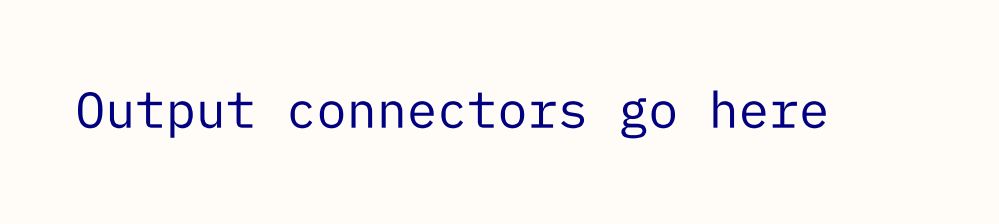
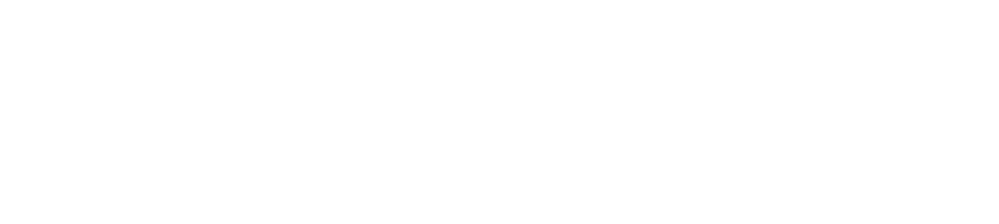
text: Output connectors go here (451, 114) -> none

